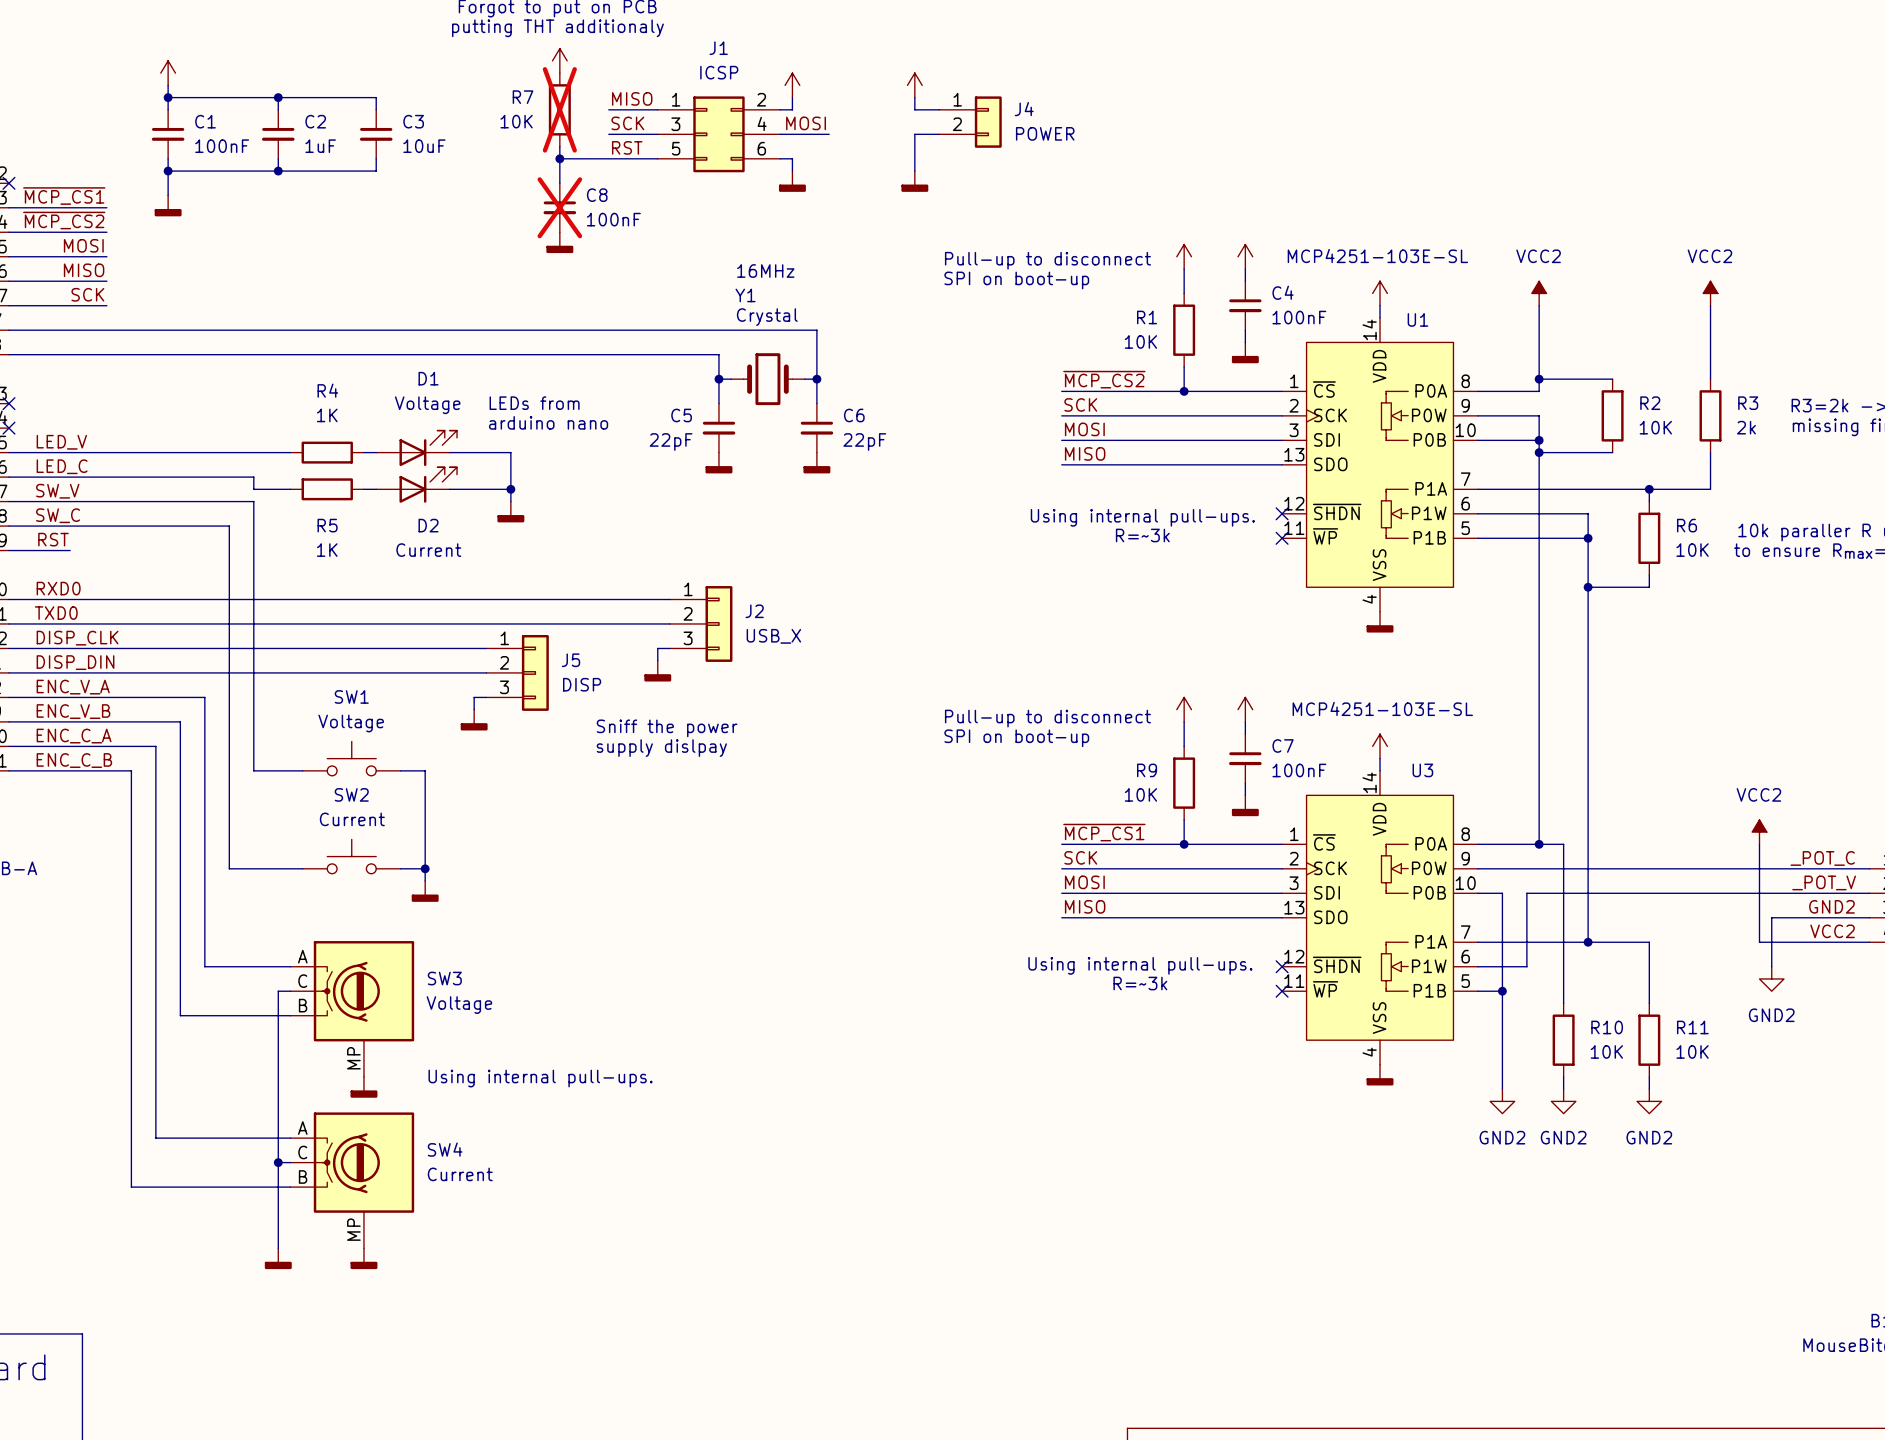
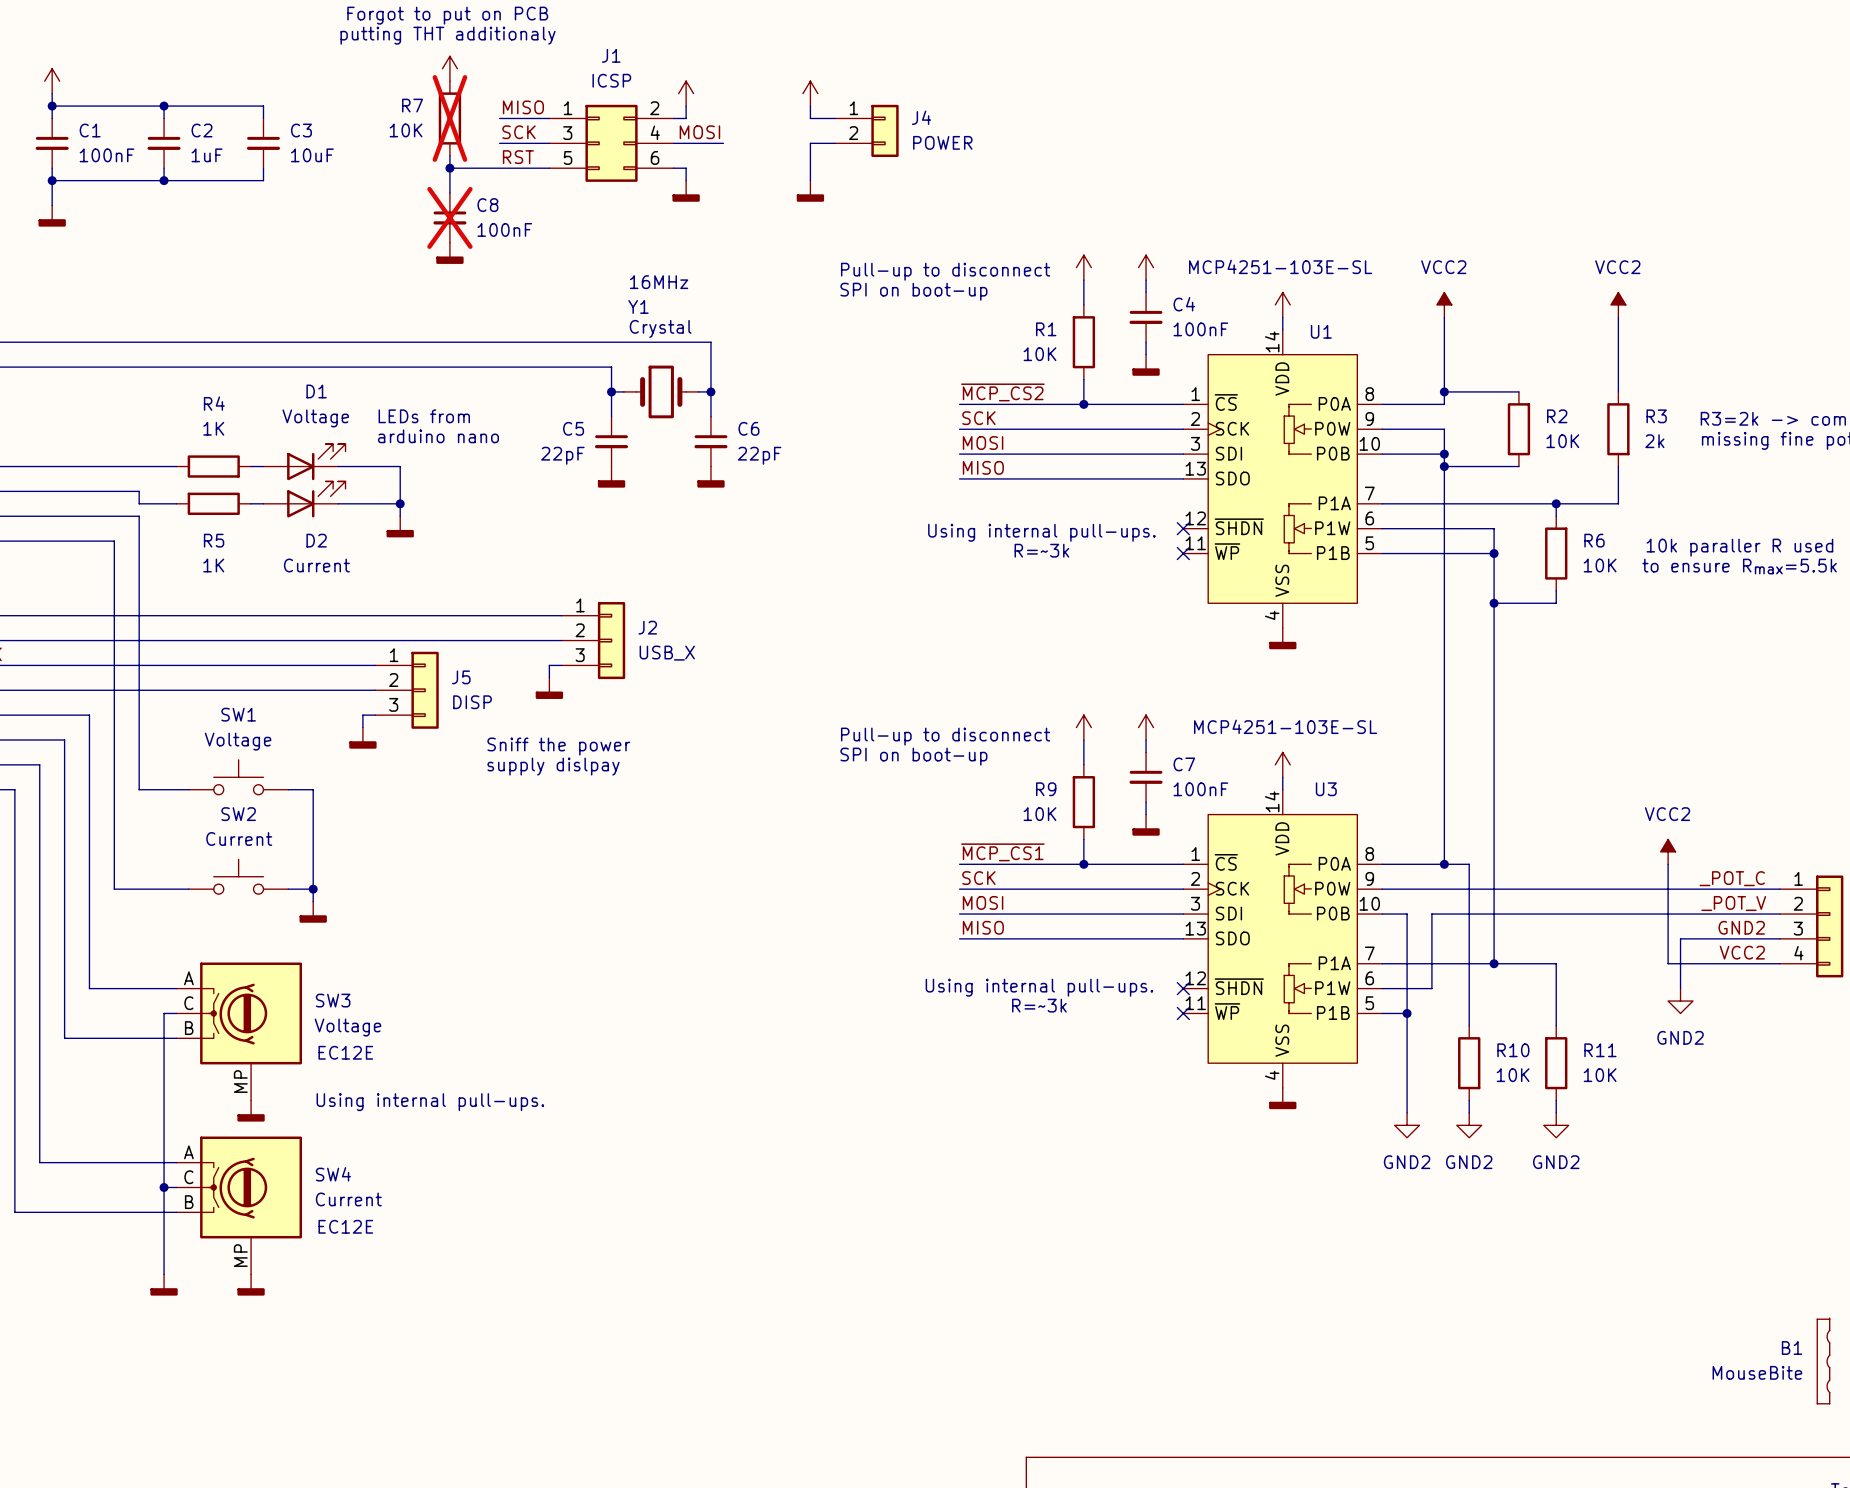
SW3 text: none -> EC12E (345, 1052)
SW4 text: none -> EC12E (345, 1226)

